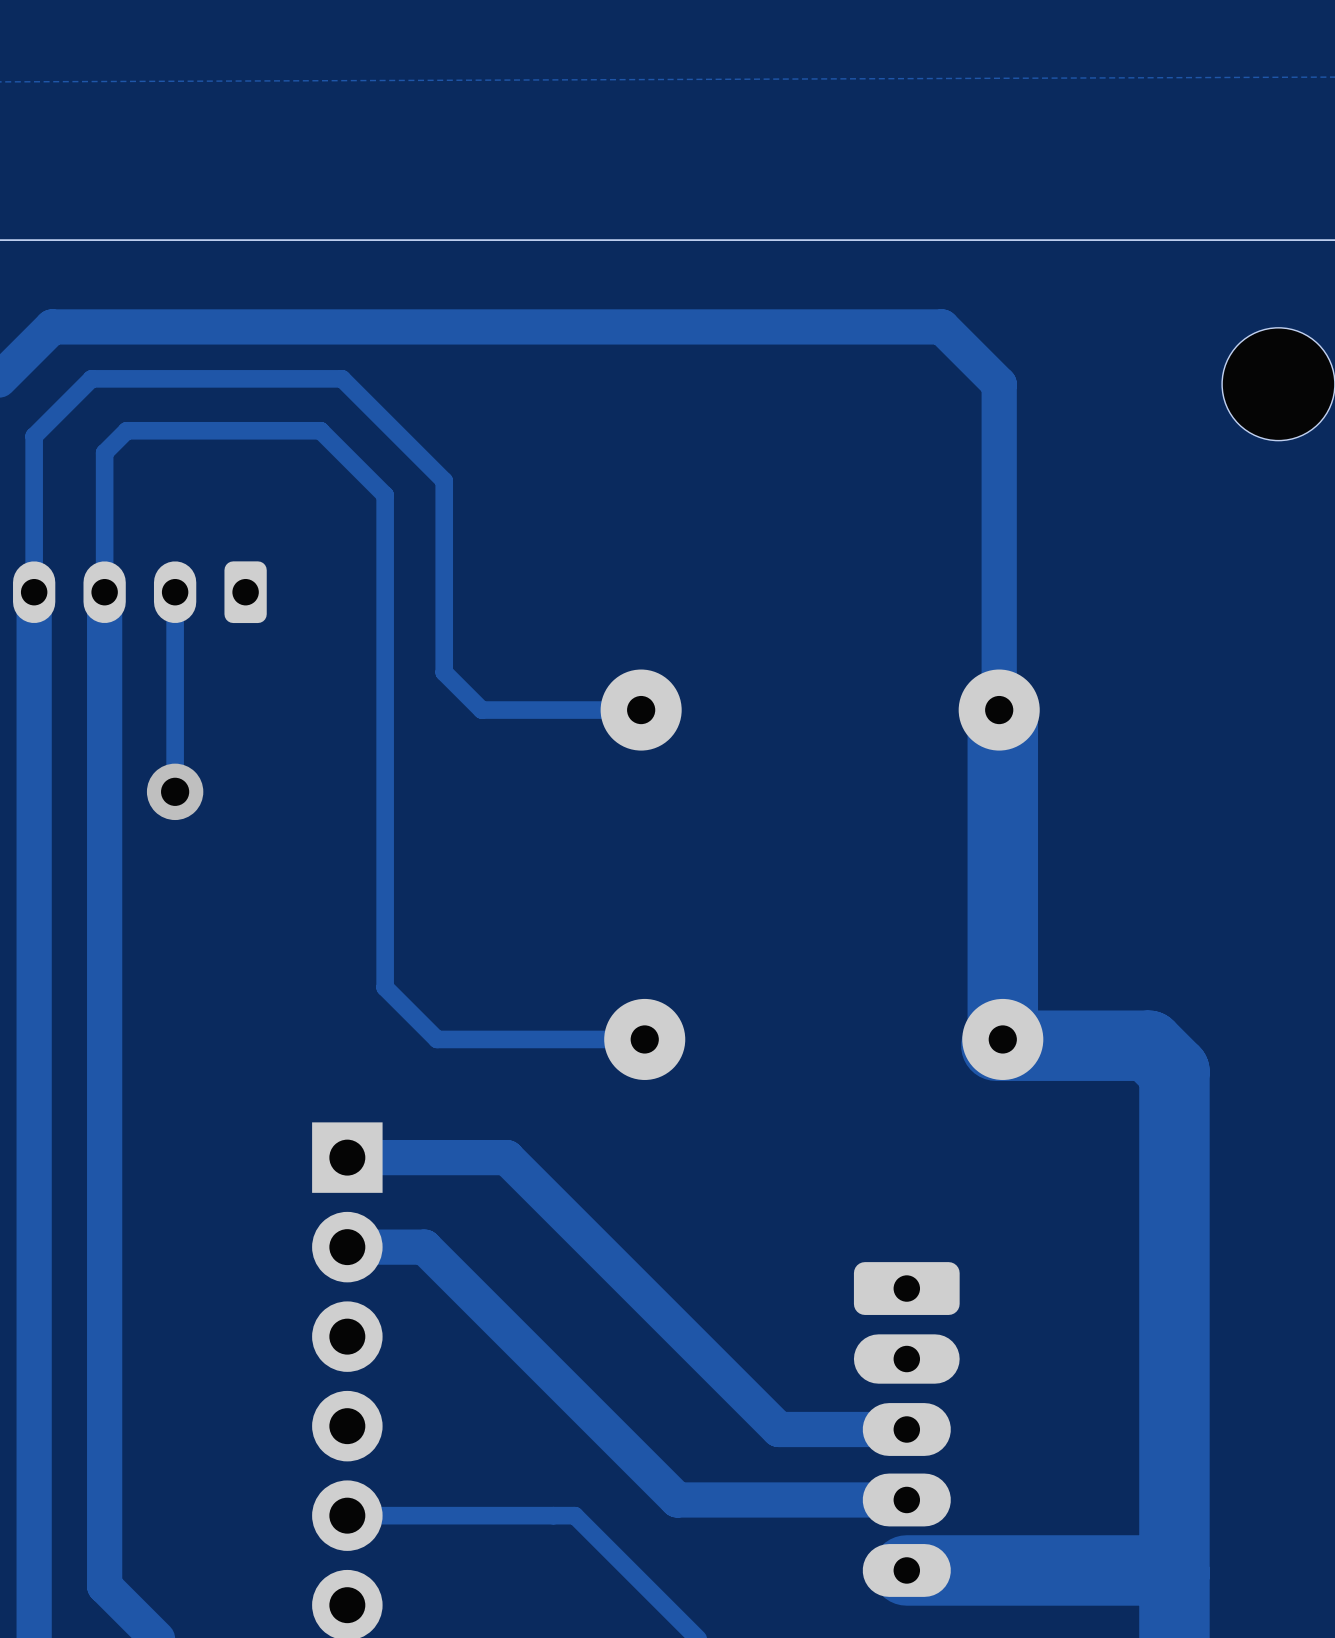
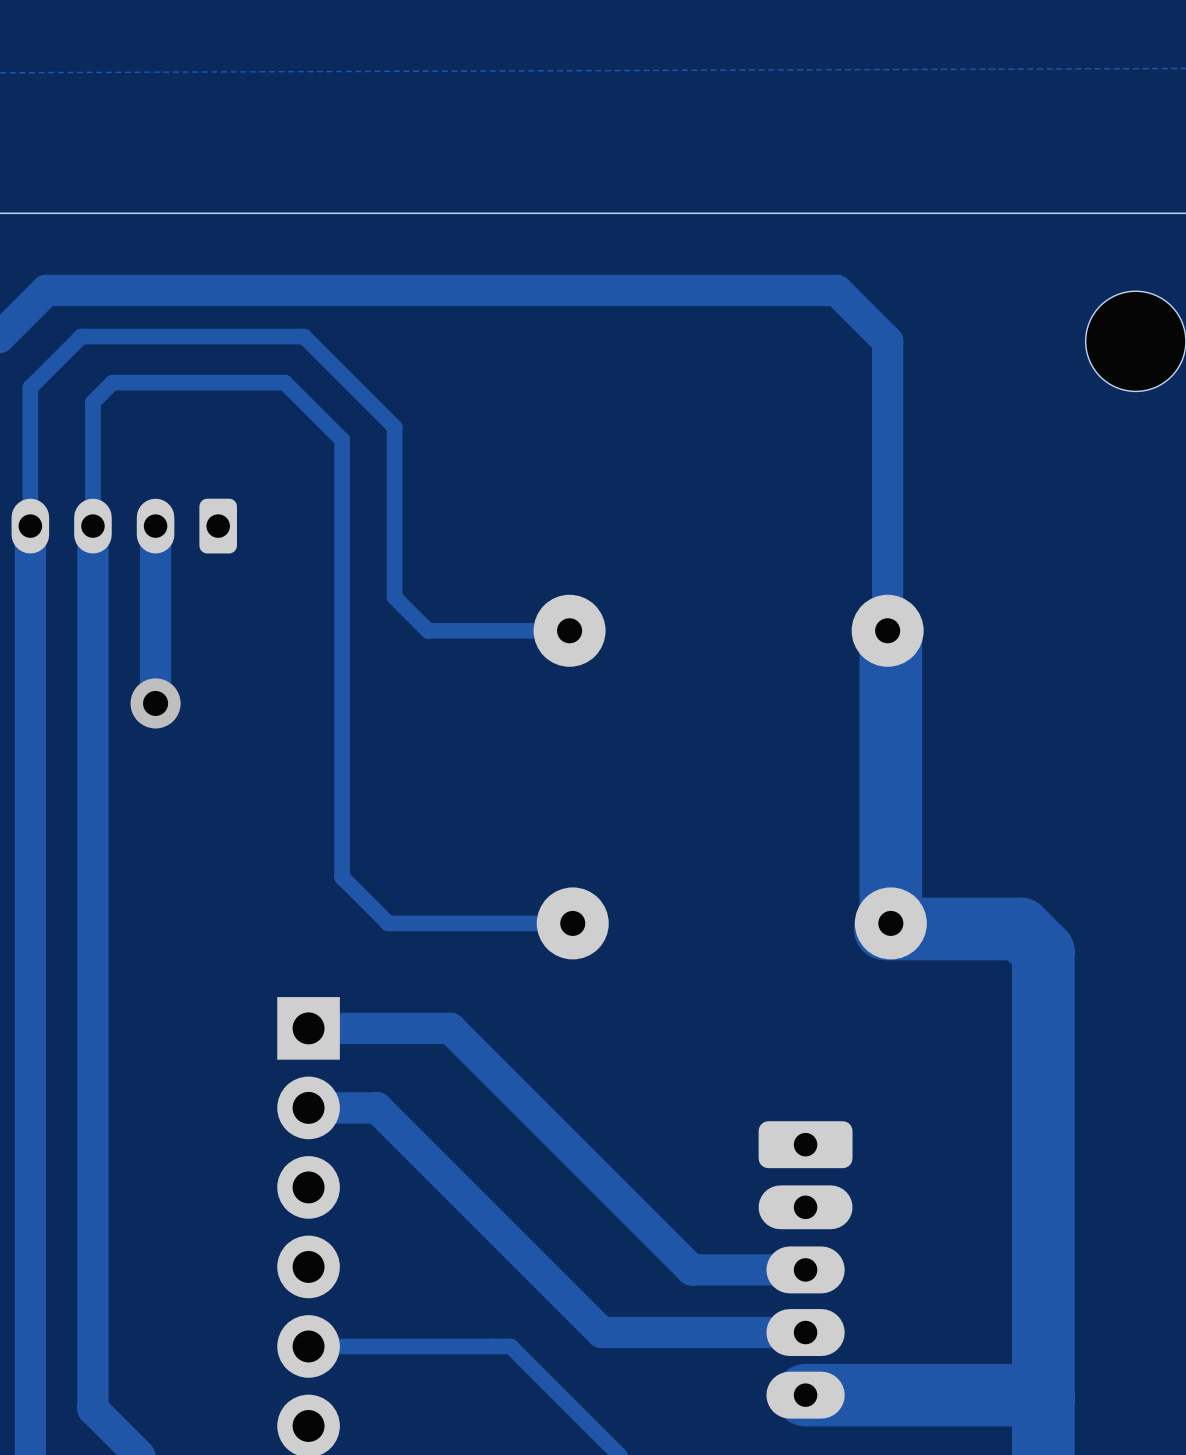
track width: thin (175, 592) (175, 791) -> thick (155, 526) (155, 703)

